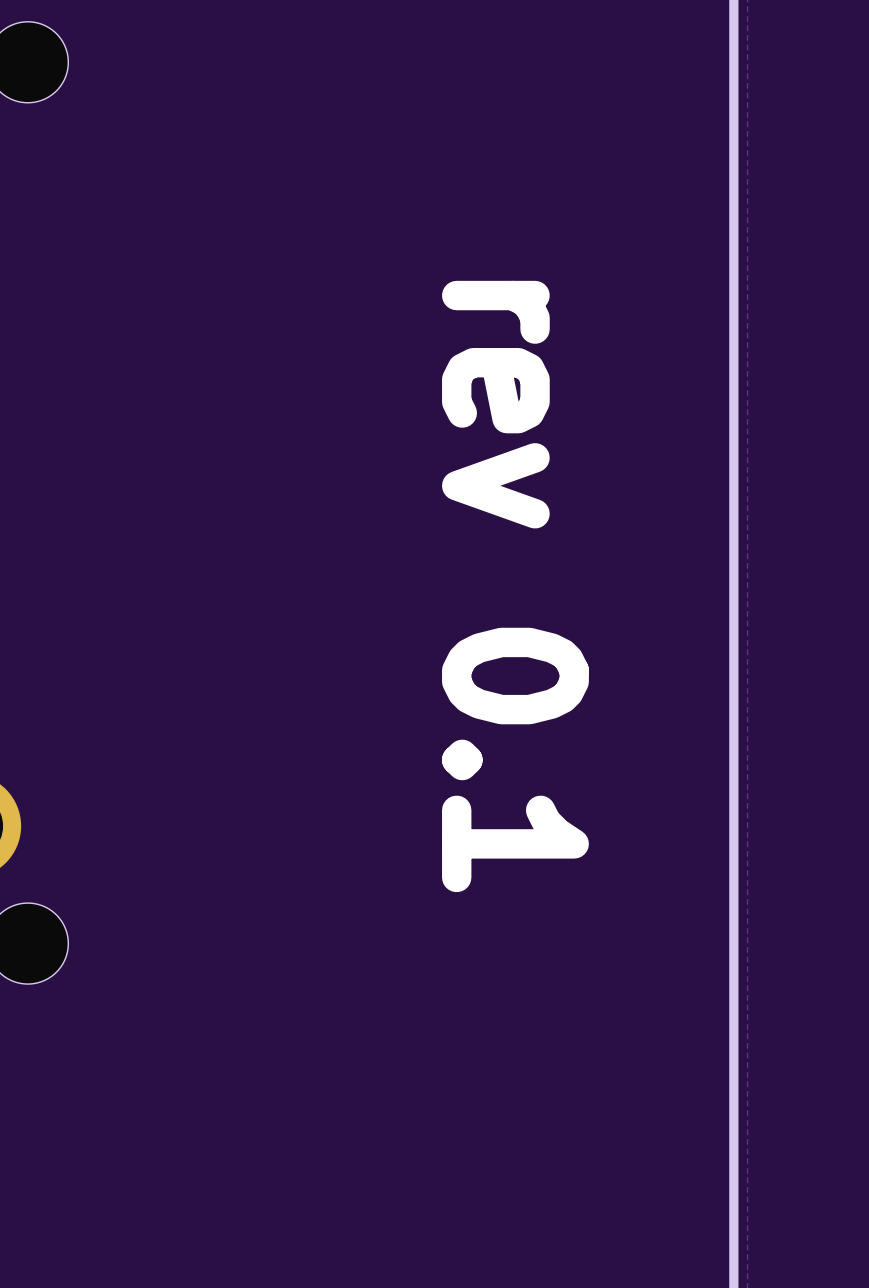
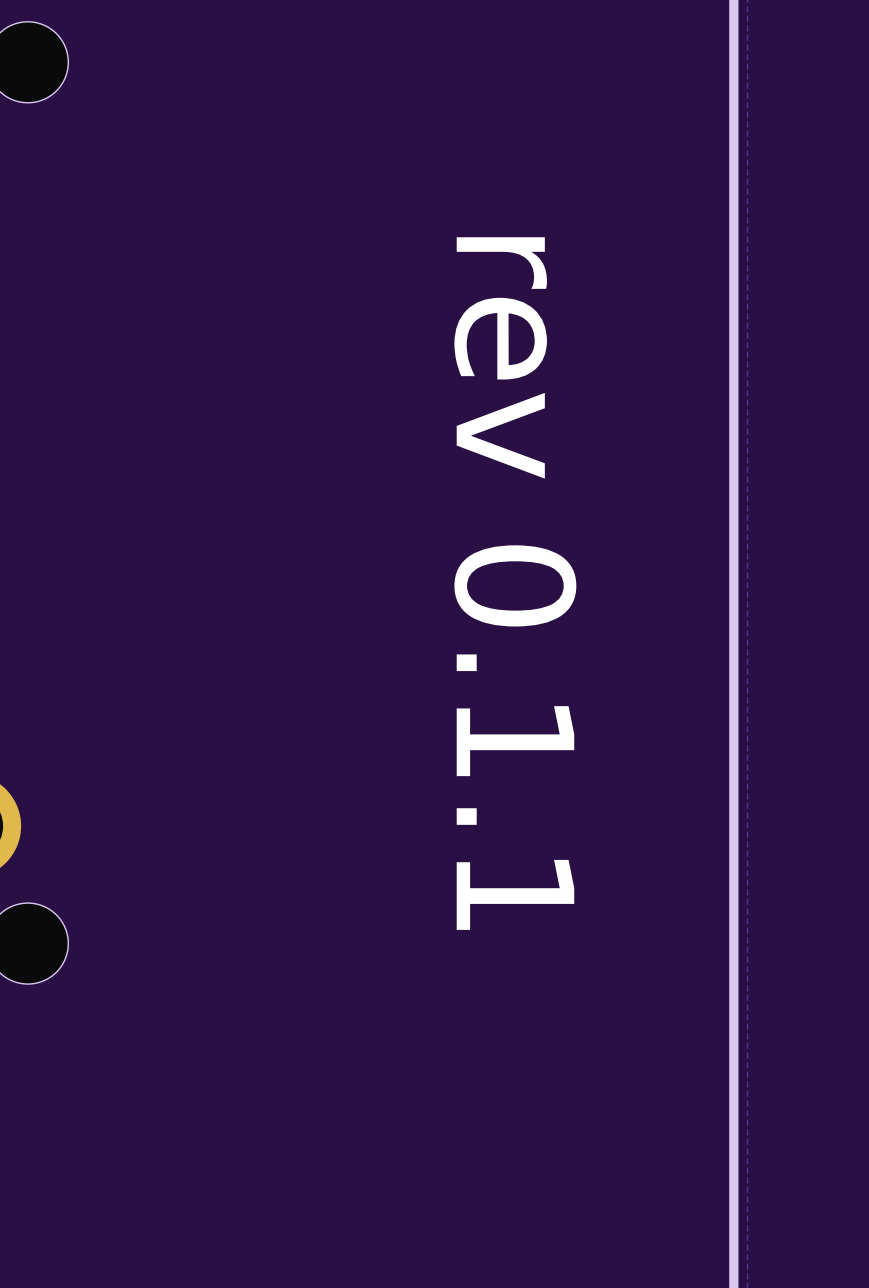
text: rev 0.1 (515, 586) -> rev 0.1.1 (515, 583)

